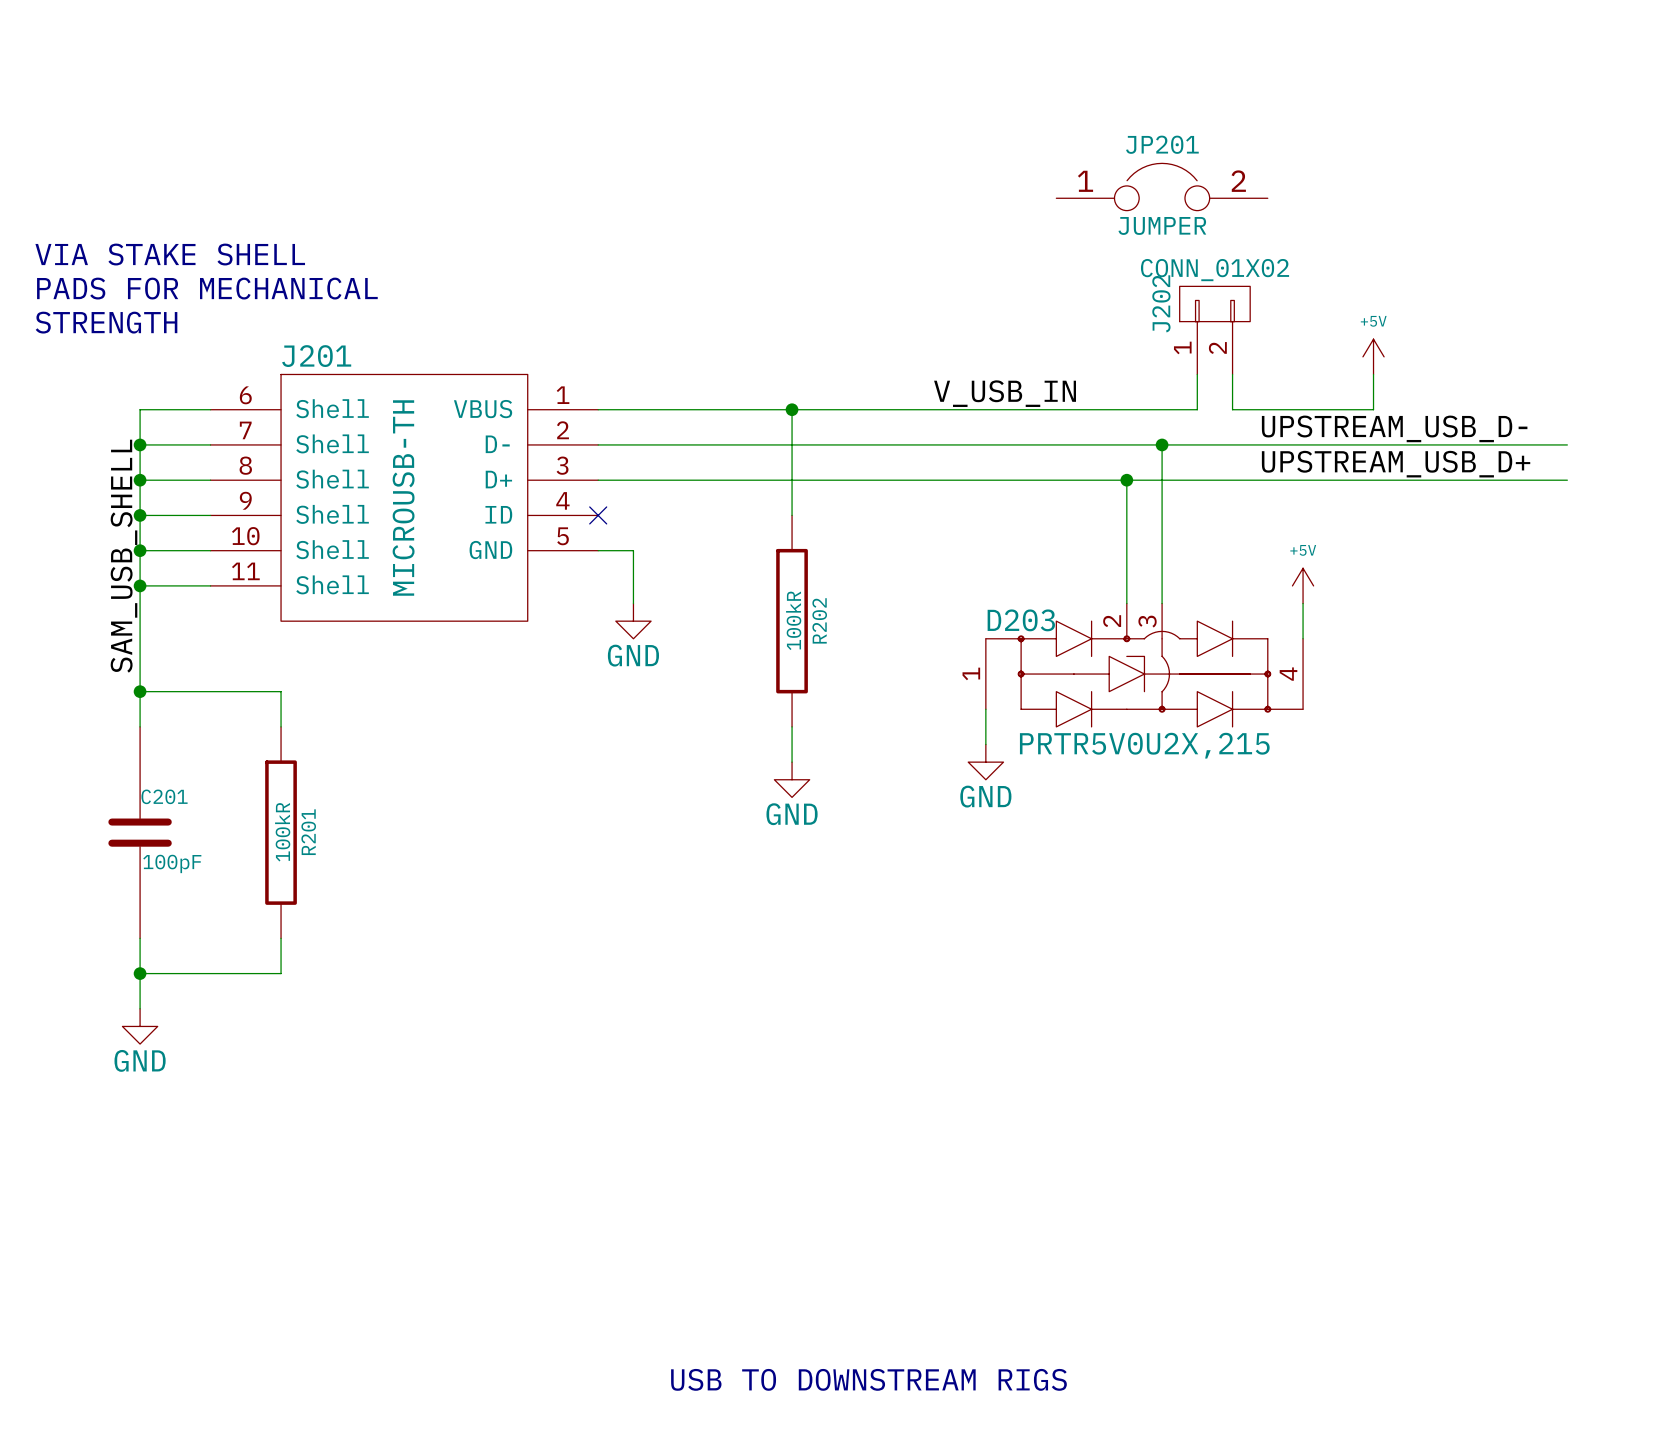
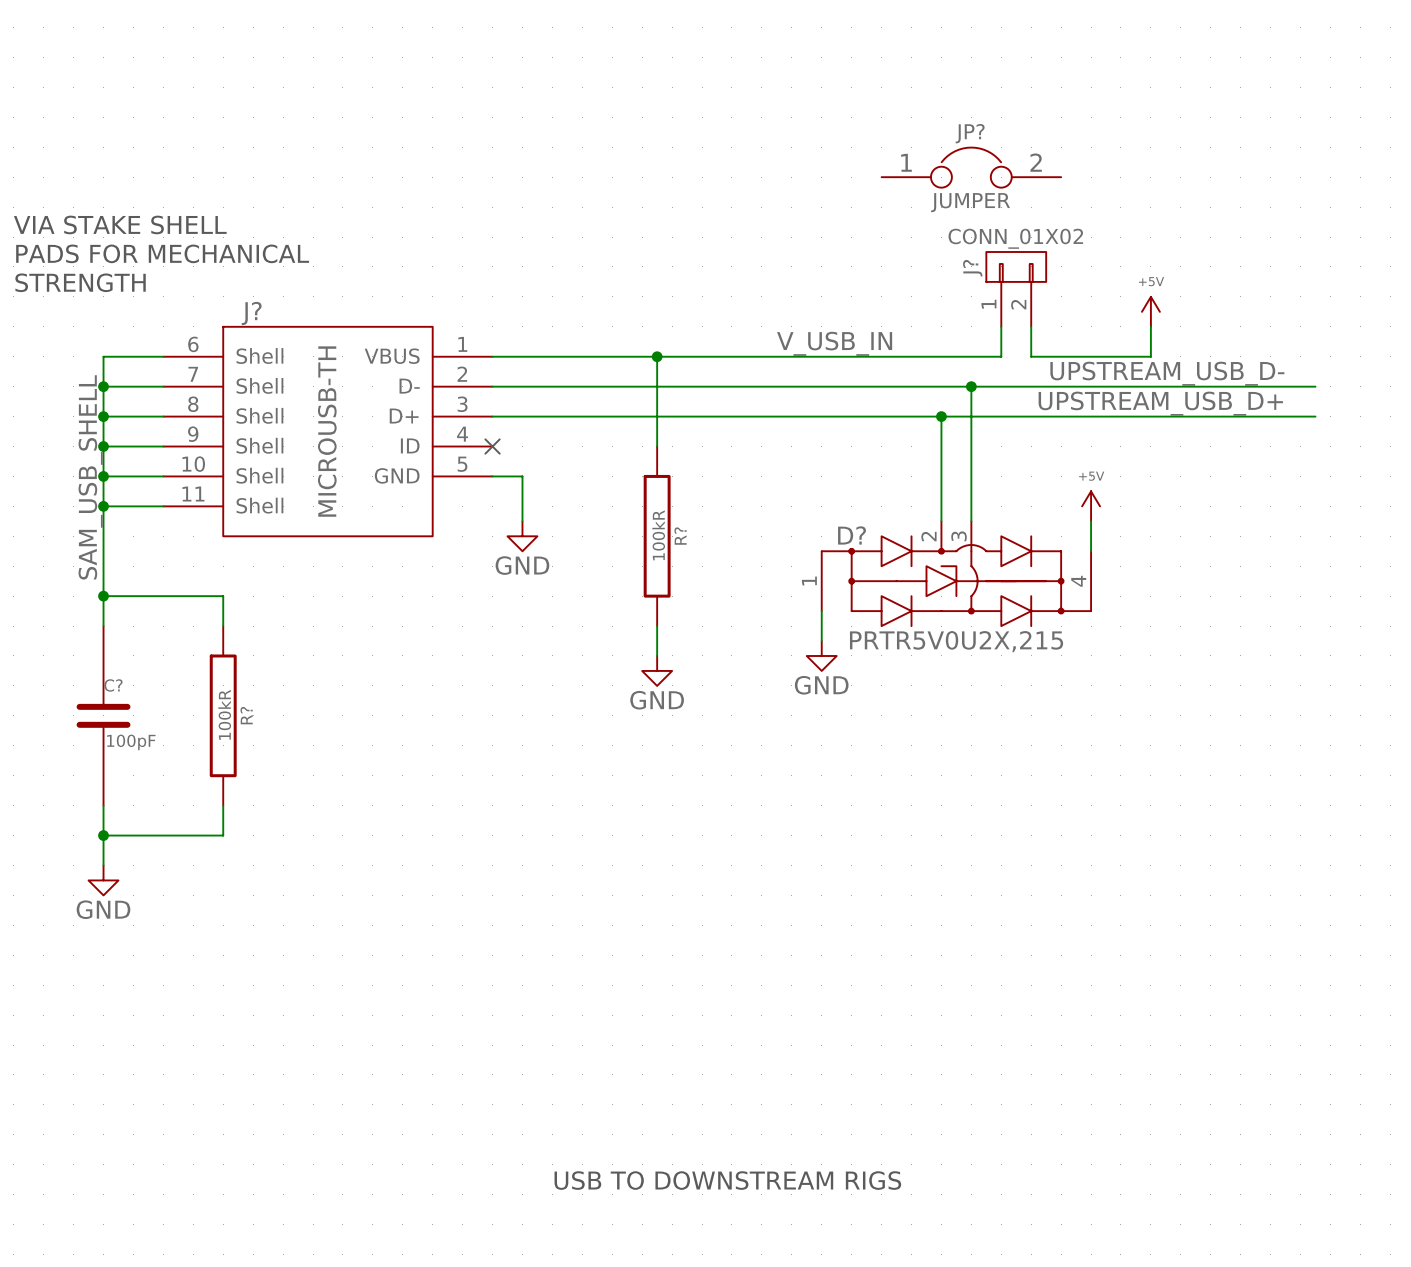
JP201 name: JP201 (1162, 144) -> JP? (970, 133)
J202 name: J202 (1161, 303) -> J? (972, 268)
J201 name: J201 (316, 356) -> J? (251, 313)
R202 name: R202 (819, 620) -> R? (680, 536)
D203 name: D203 (1021, 620) -> D? (852, 535)
C201 name: C201 (164, 796) -> C? (113, 685)
R201 name: R201 (308, 832) -> R? (246, 715)

